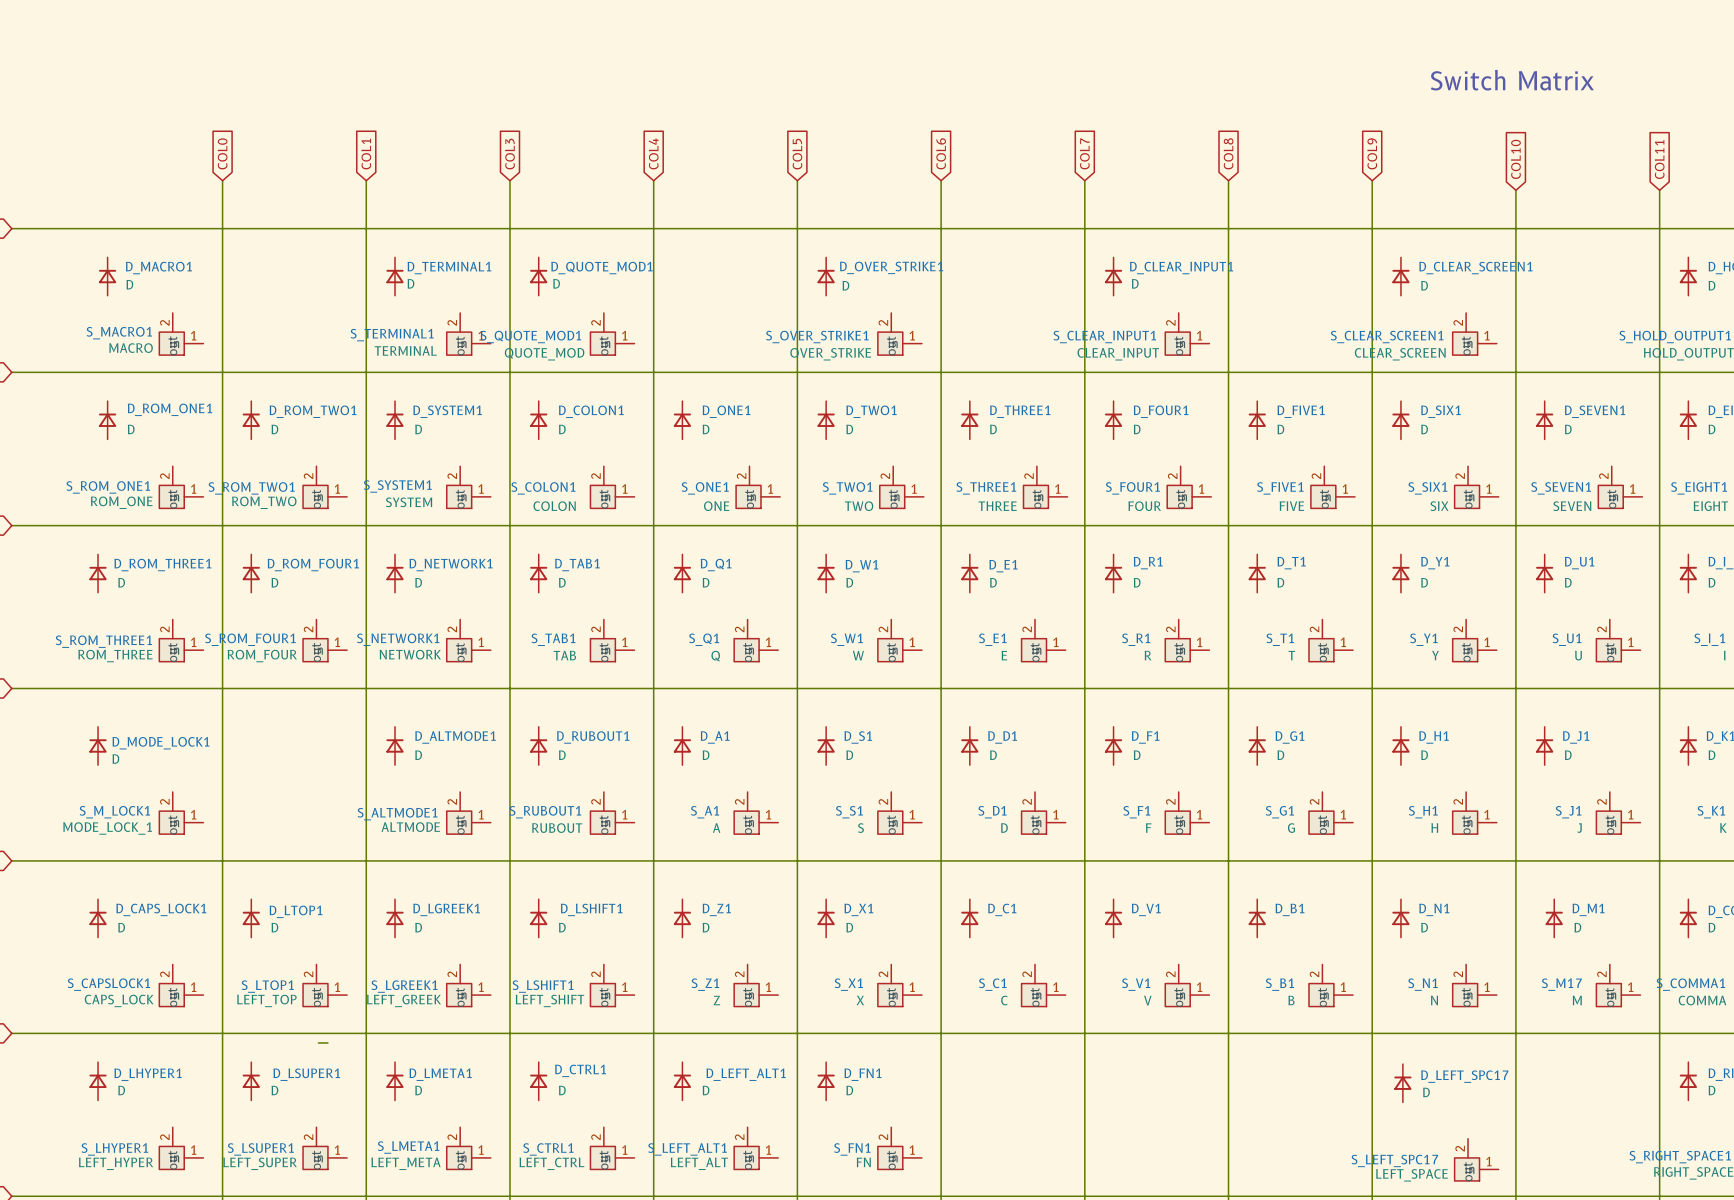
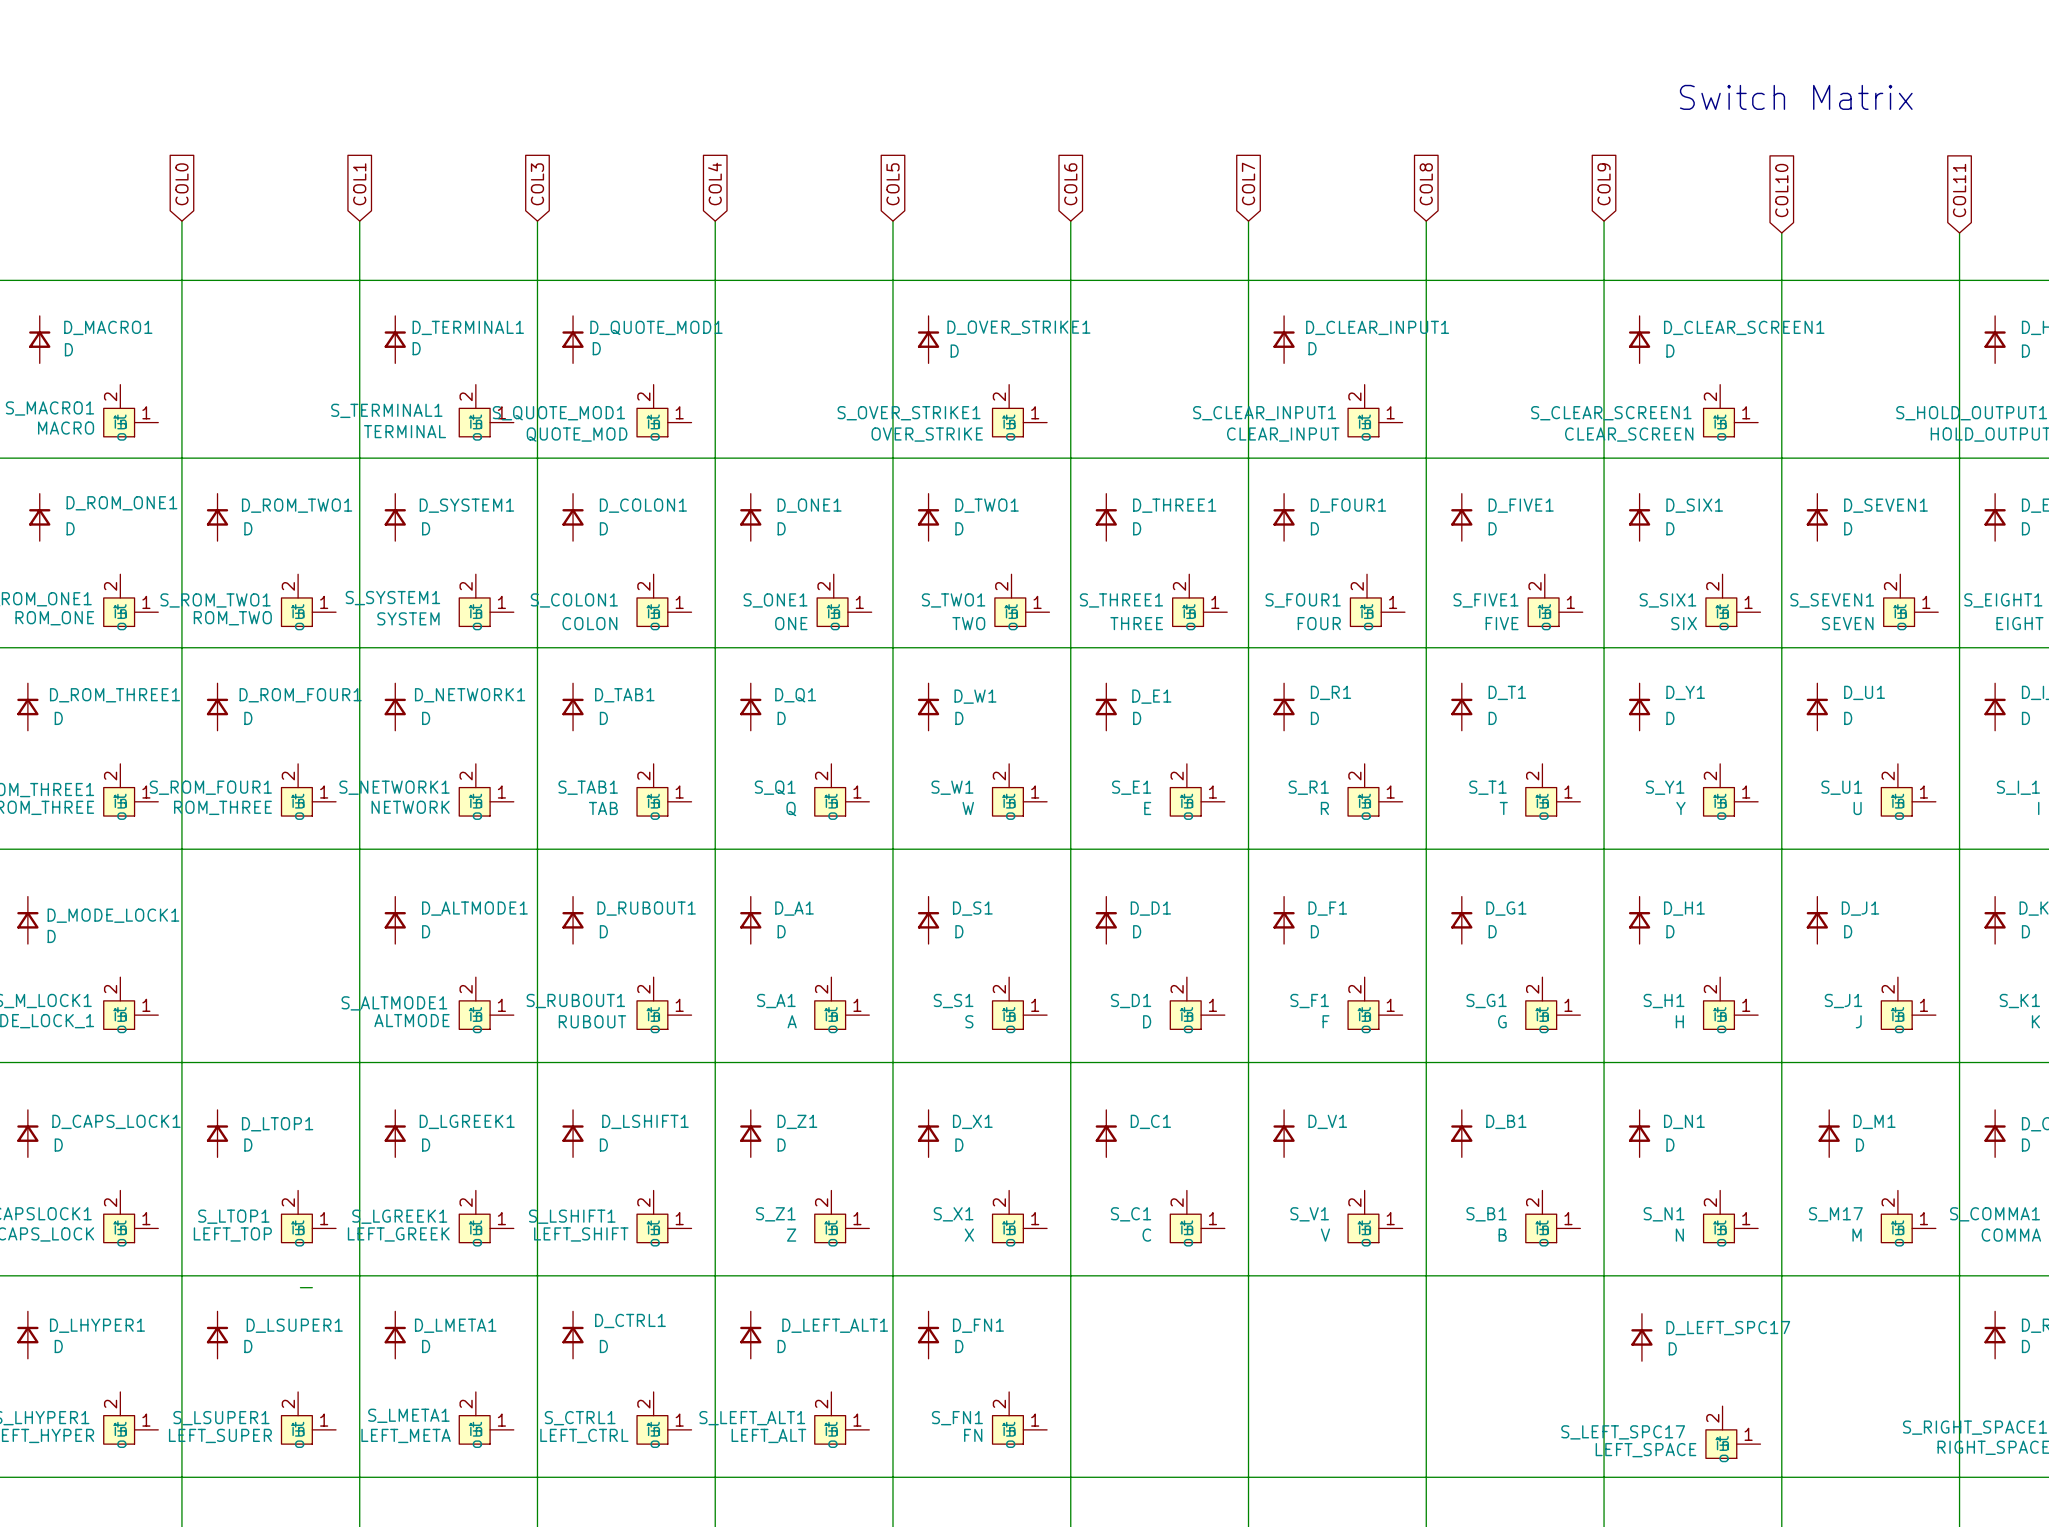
S_ROM_FOUR1 value: ROM_FOUR (262, 656) -> ROM_THREE (222, 807)

